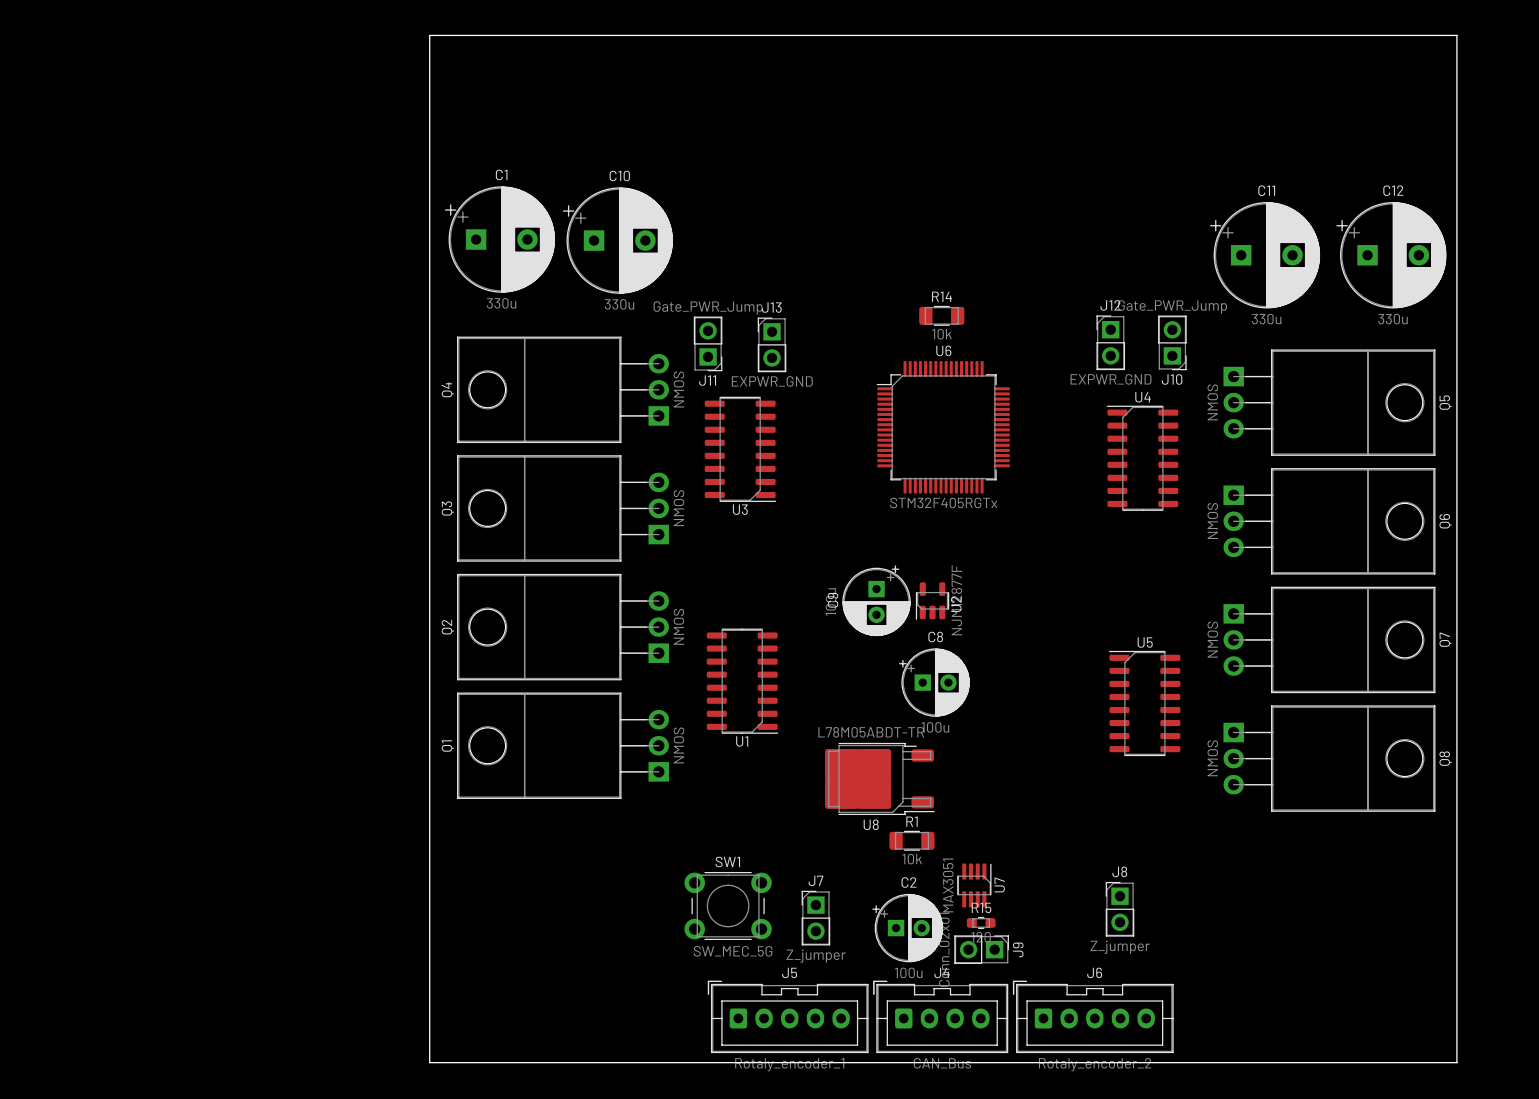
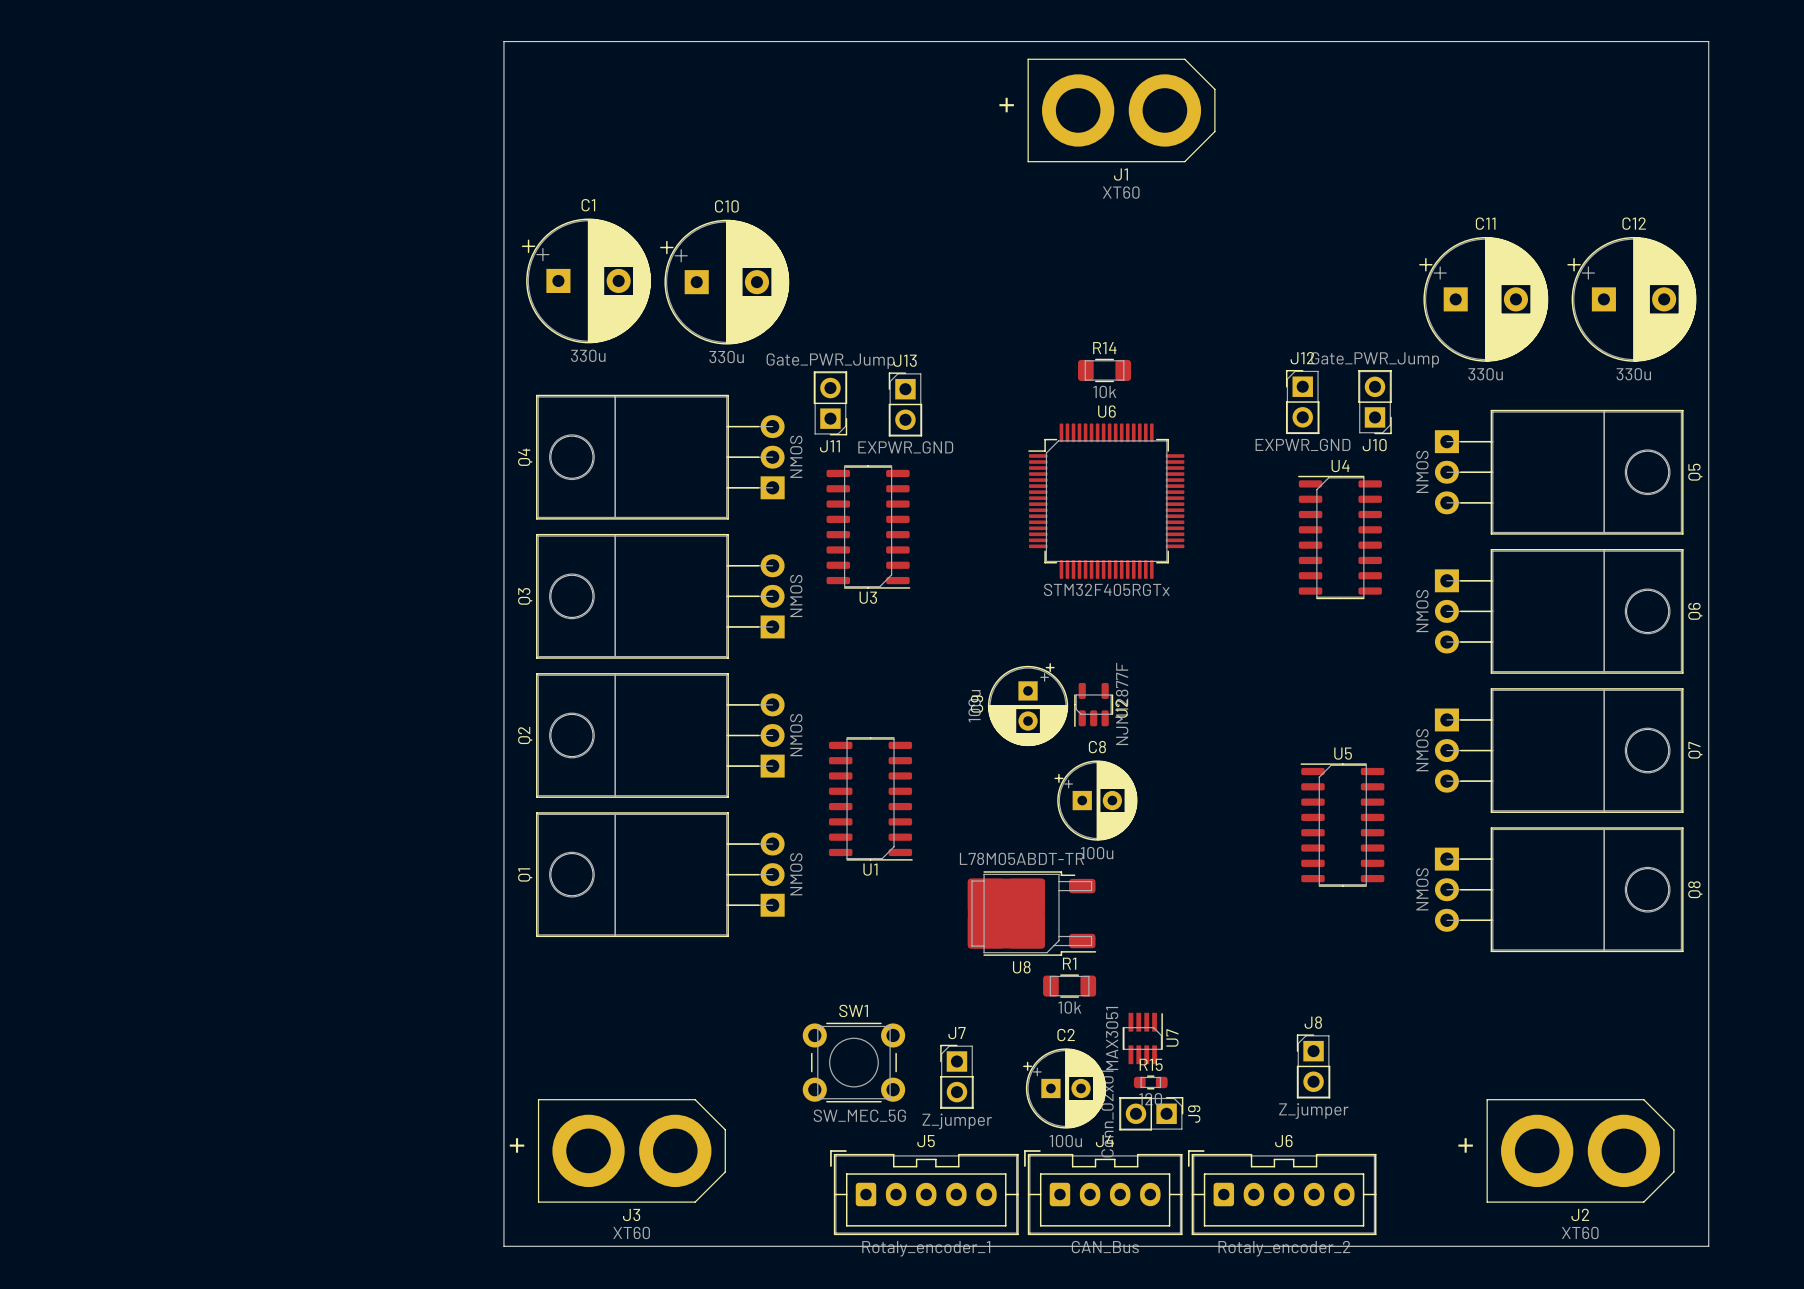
J1: none -> XT60 (1121, 110)
J3: none -> XT60 (631, 1150)
J2: none -> XT60 (1580, 1150)

